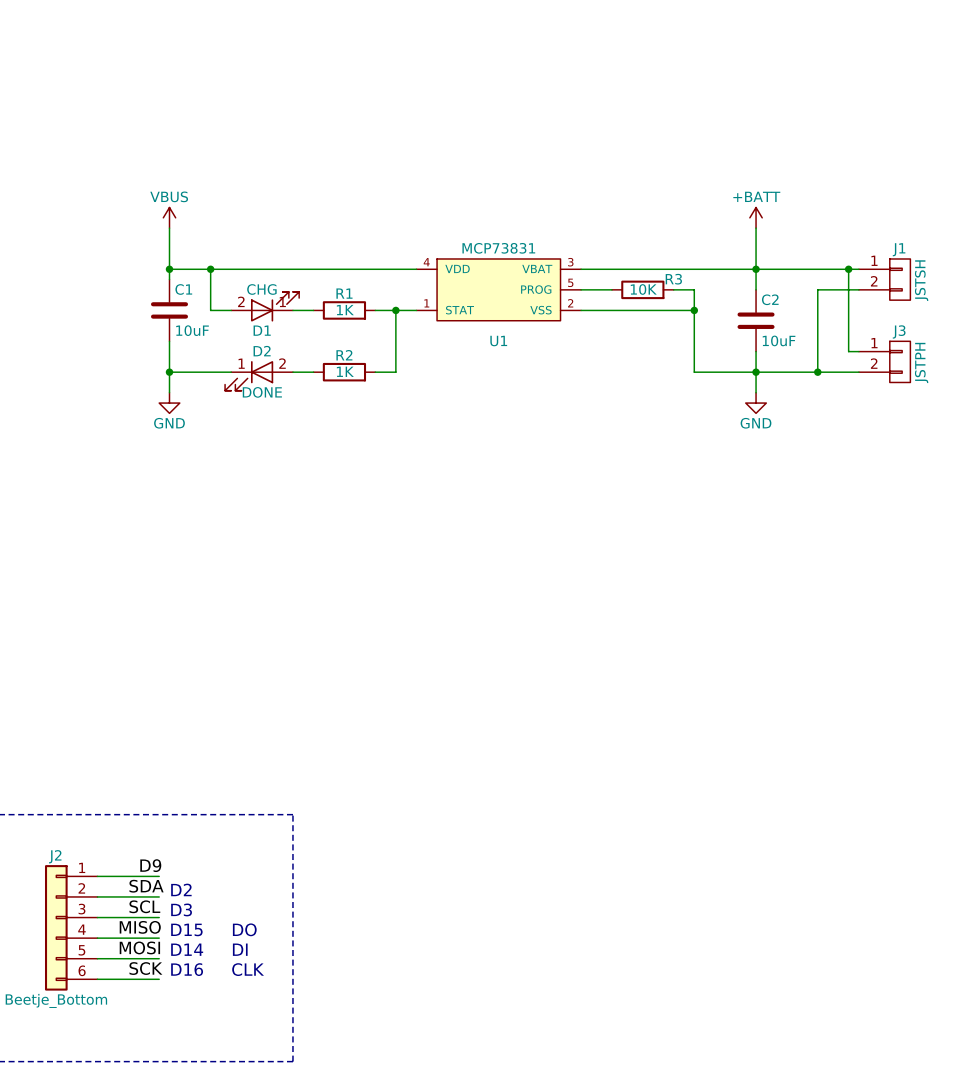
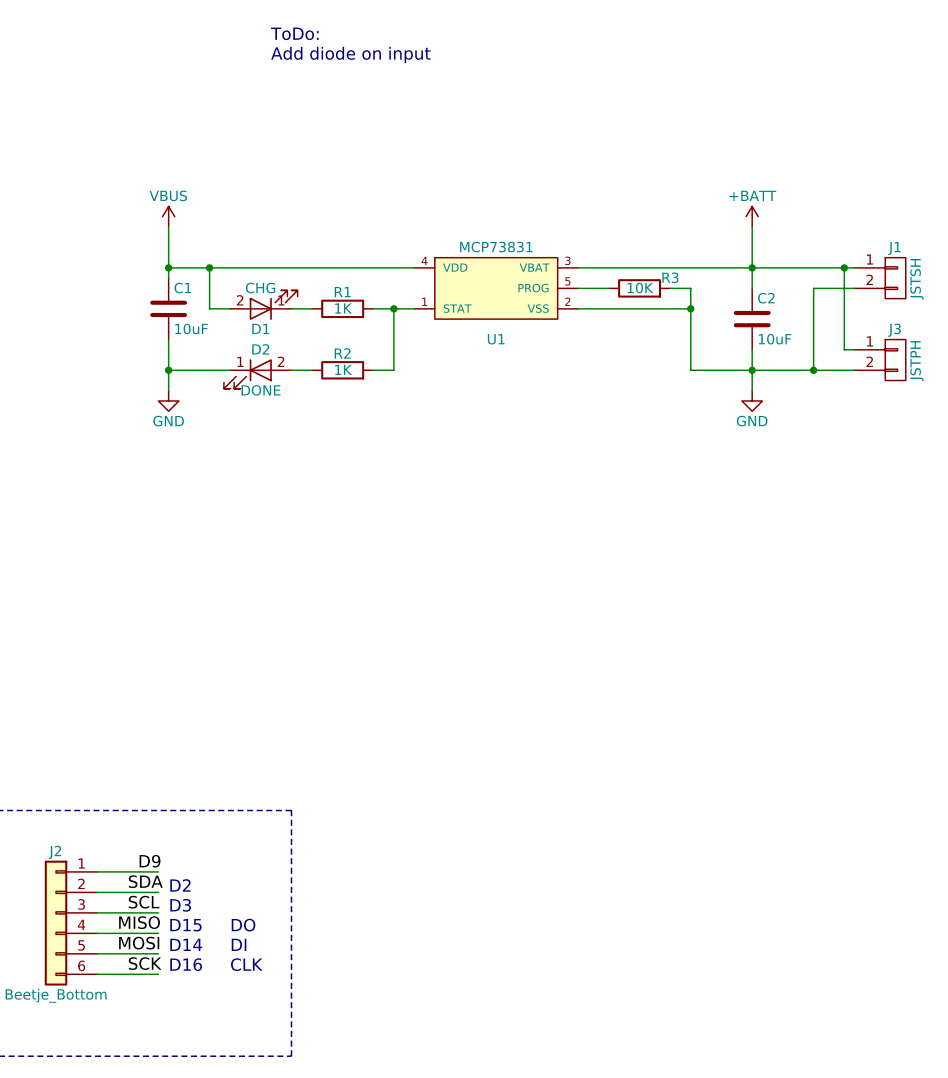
text: none -> ToDo: (294, 33)
text: none -> Add diode on input (350, 54)

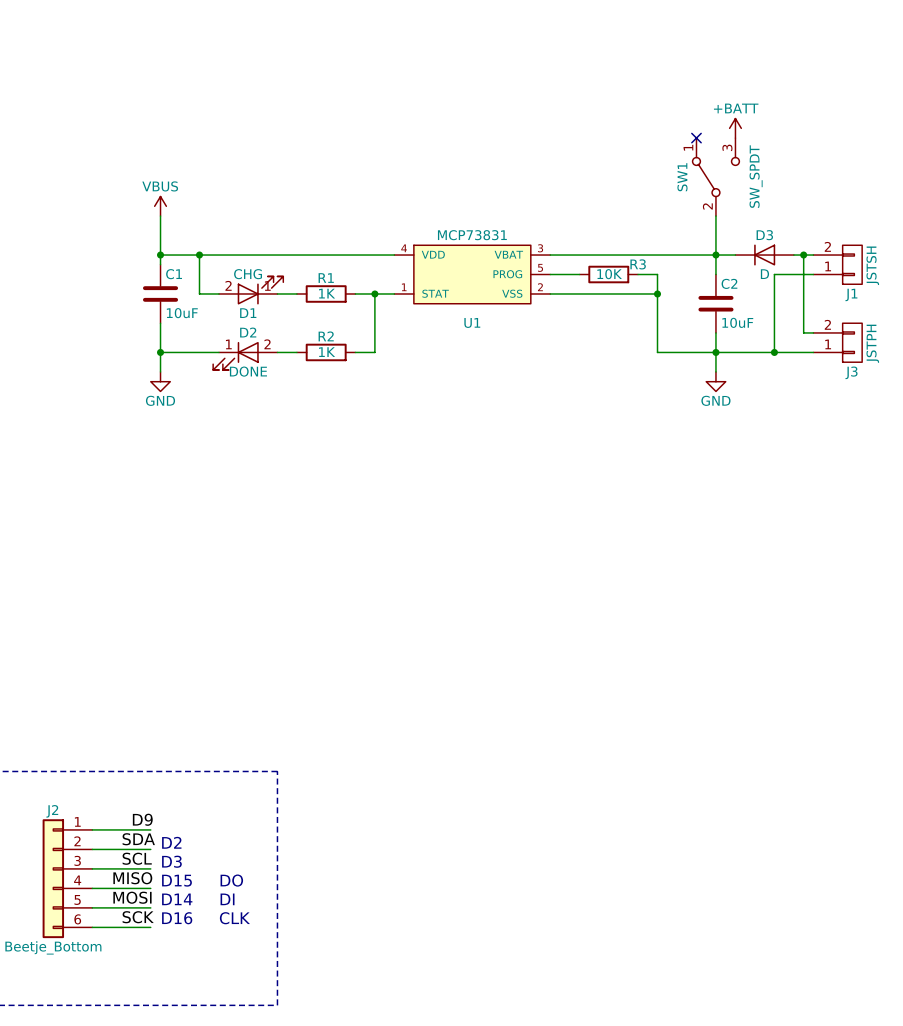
text: ToDo: (294, 33) -> none
text: Add diode on input (350, 54) -> none
no-connect mark: none -> (696, 138)
SW1: none -> SW_SPDT (715, 177)
power symbol position: +BATT (752, 216) -> +BATT (735, 128)
D3: none -> D (764, 255)
J1 flip: as is (895, 278) -> up-down (852, 264)
J3 flip: as is (895, 360) -> up-down (852, 342)

